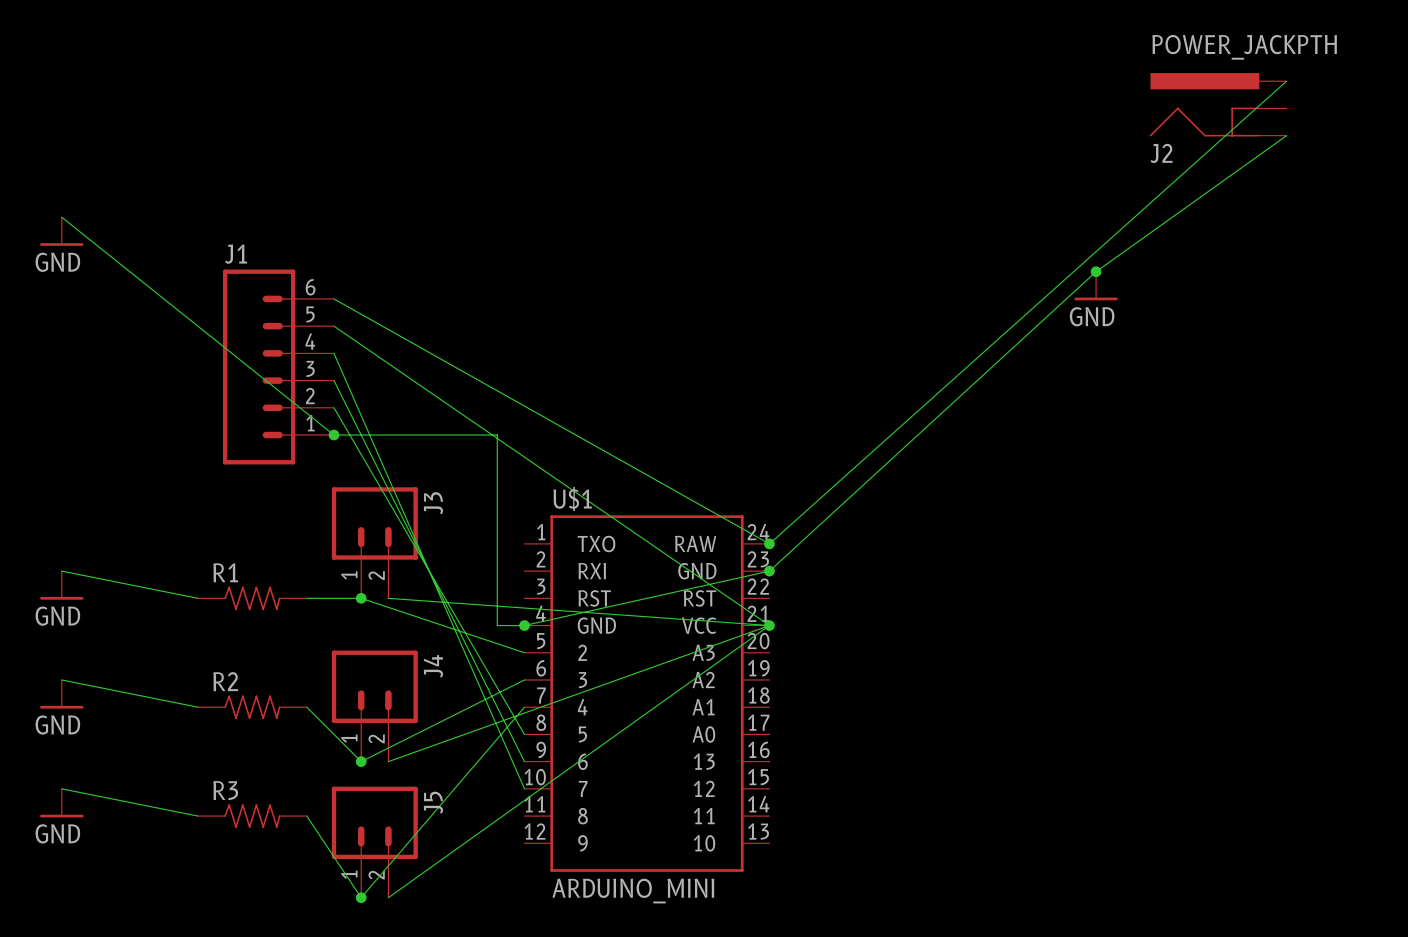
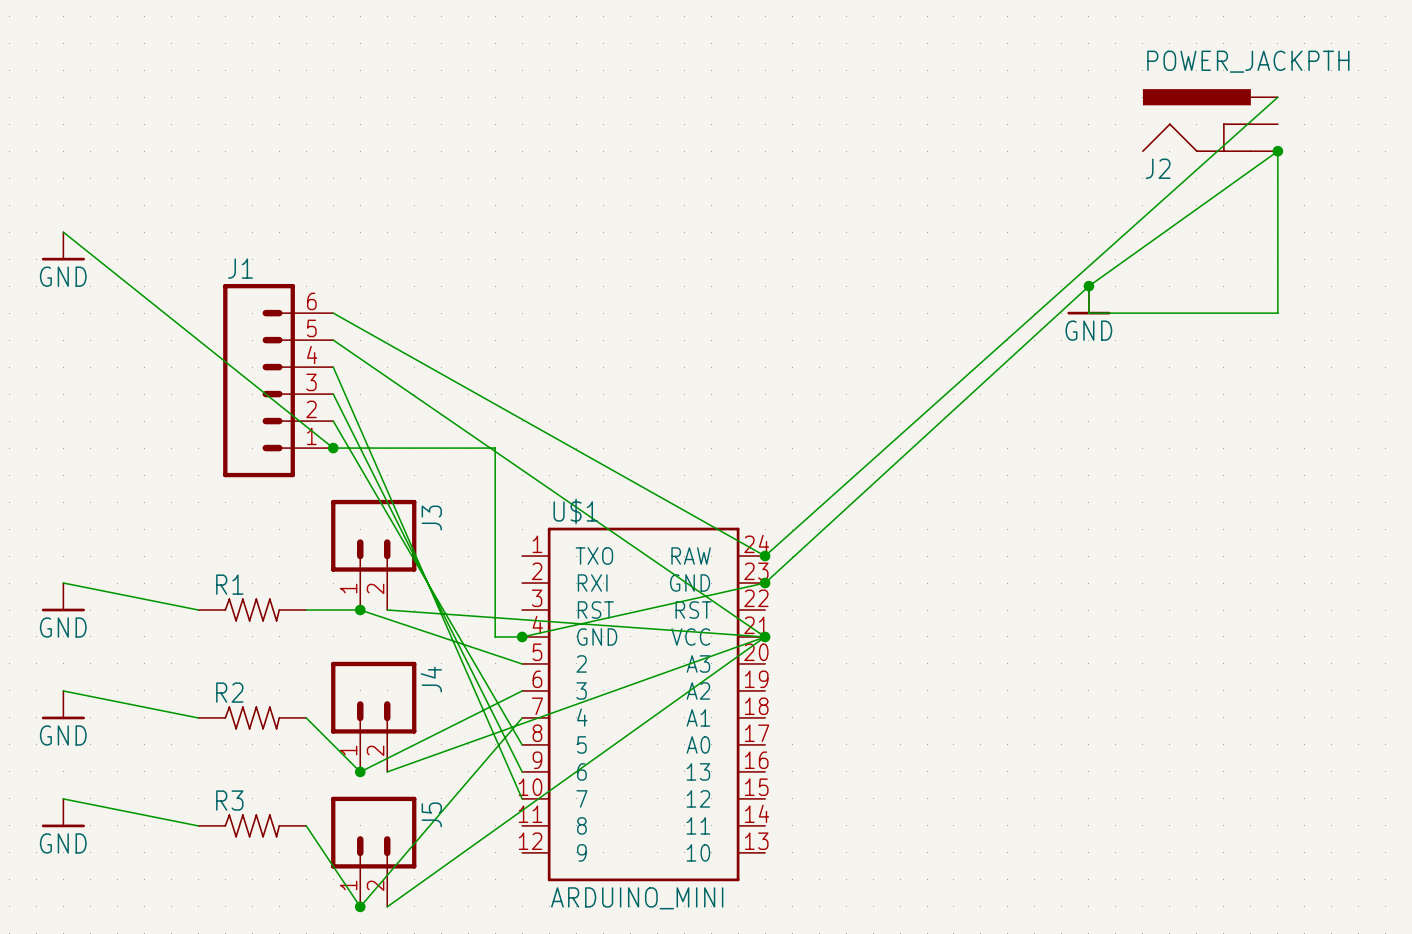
wire: none -> (1277, 151) (1277, 313) (1088, 313) (1088, 286)
junction: none -> (1277, 151)

